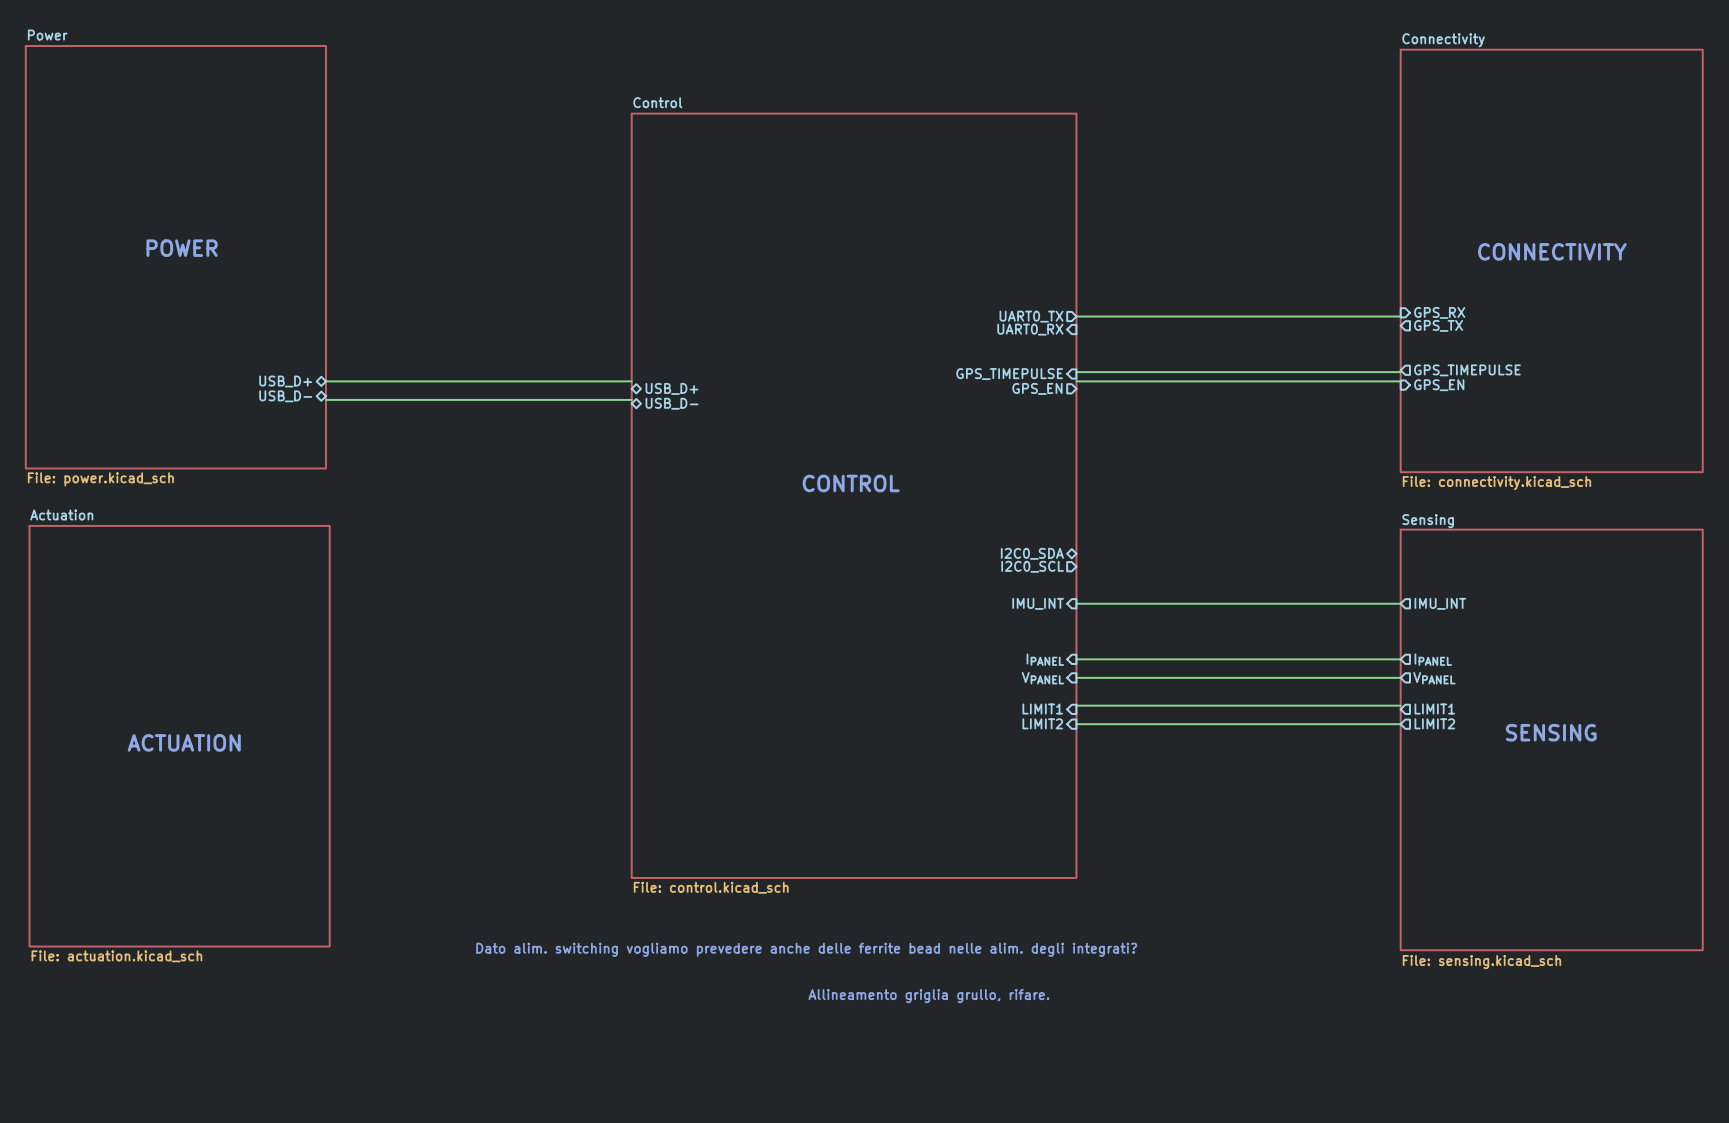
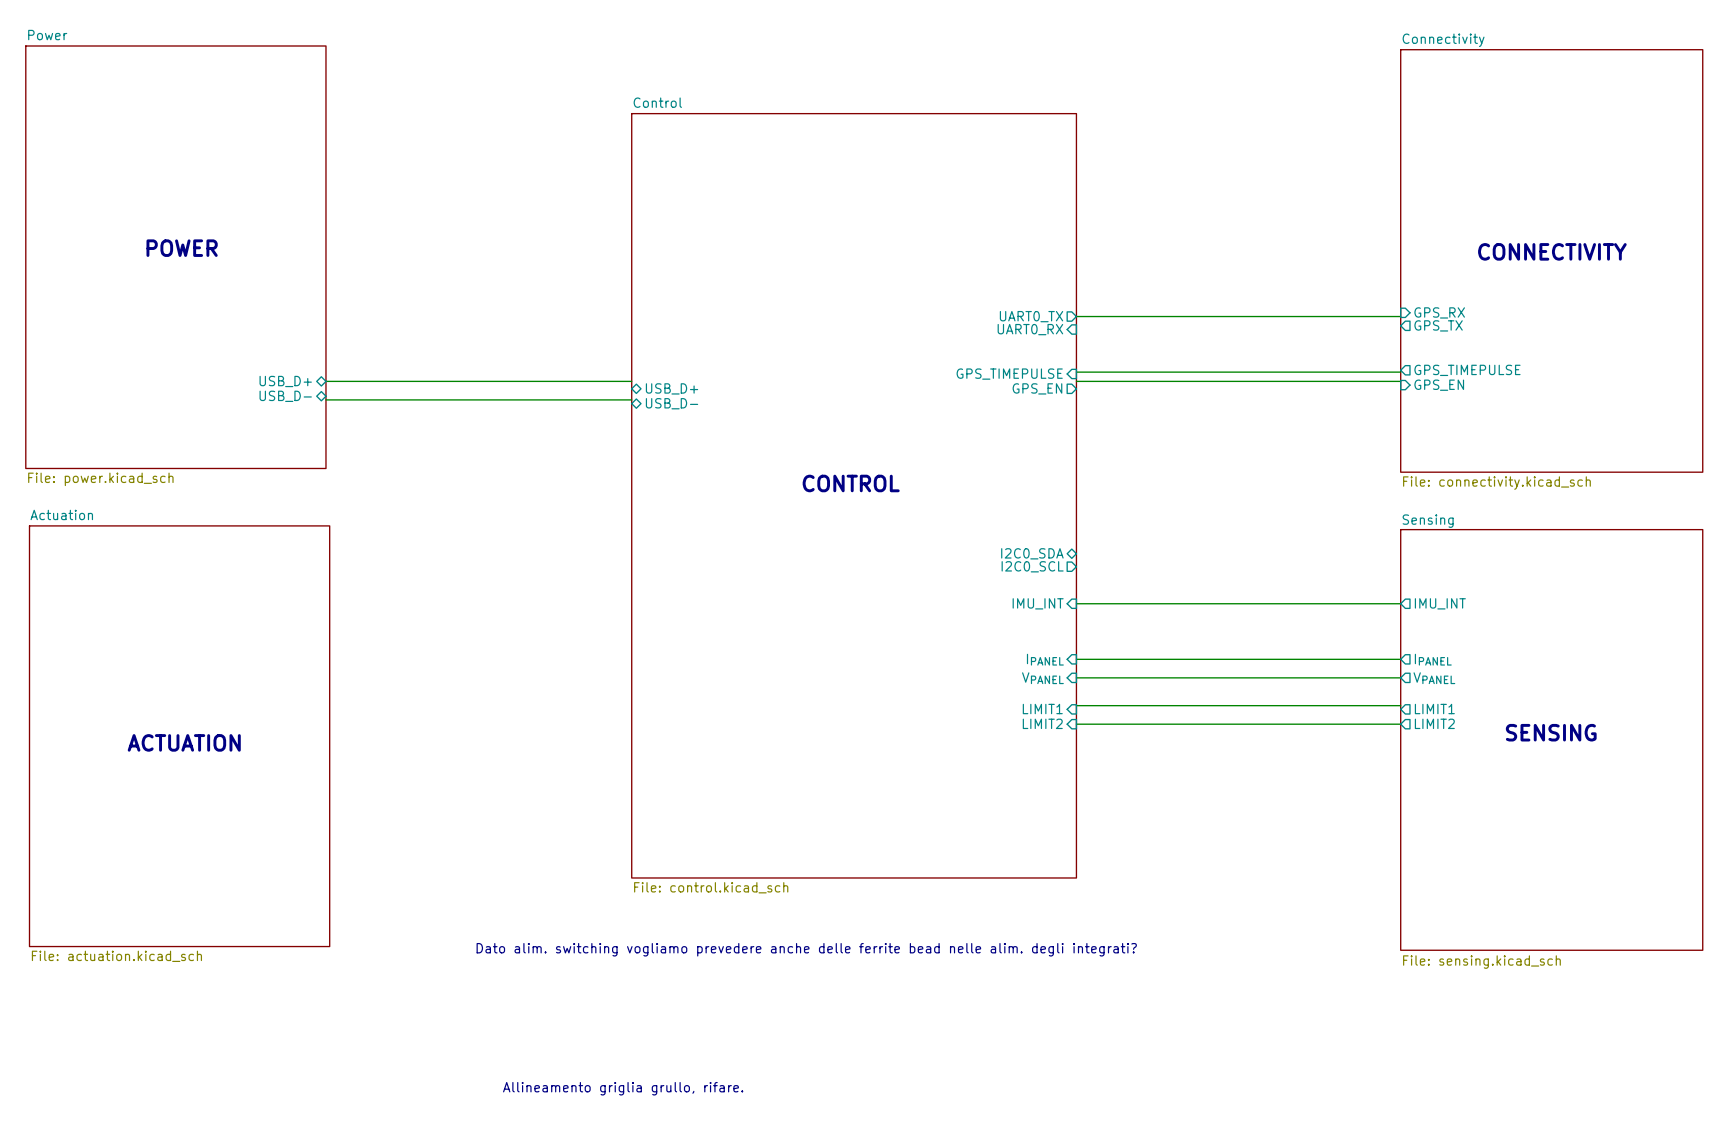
text: Allineamento griglia grullo, rifare. (928, 996) -> none
text: none -> Allineamento griglia grullo, rifare. (623, 1088)

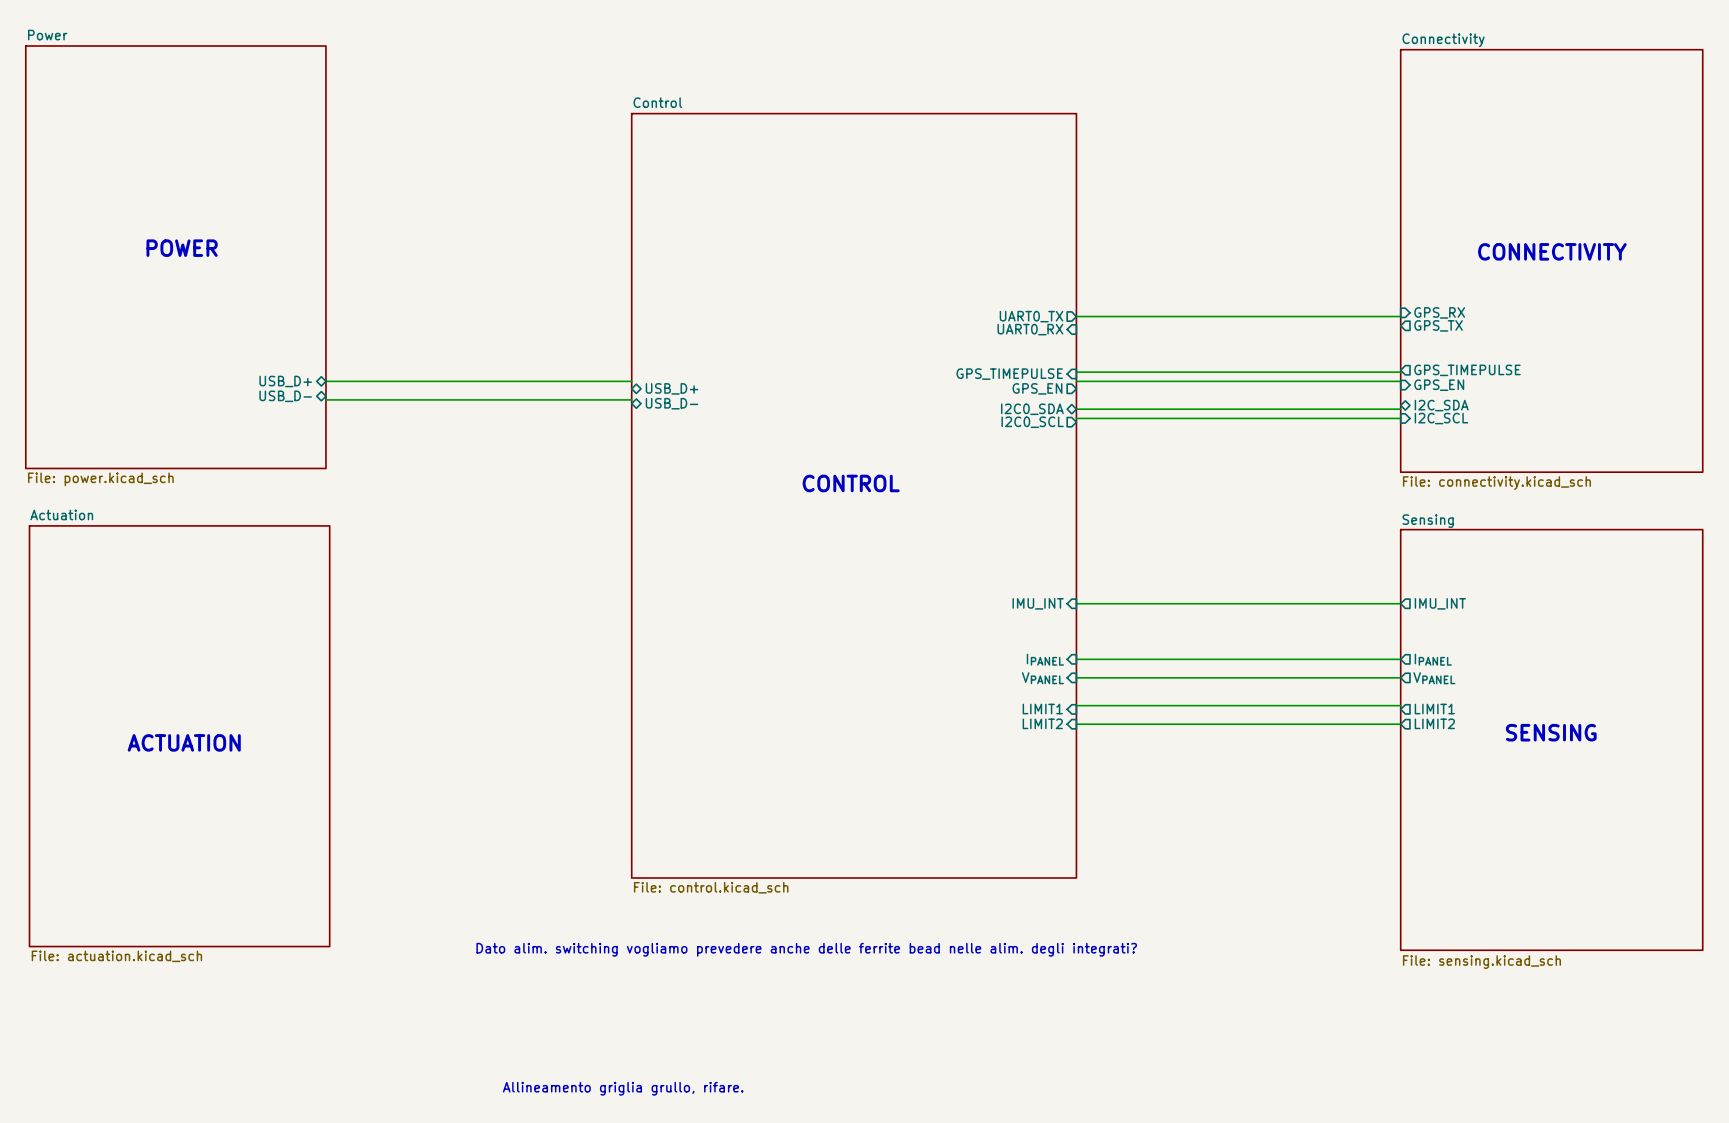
sheet pin: none -> I2C_SDA (1441, 405)
wire: none -> (1076, 409) (1400, 409)
wire: none -> (1076, 418) (1400, 418)
sheet pin: none -> I2C_SCL (1441, 418)
sheet pin position: I2C0_SDA (1032, 553) -> I2C0_SDA (1032, 409)
sheet pin position: I2C0_SCL (1032, 566) -> I2C0_SCL (1032, 422)

